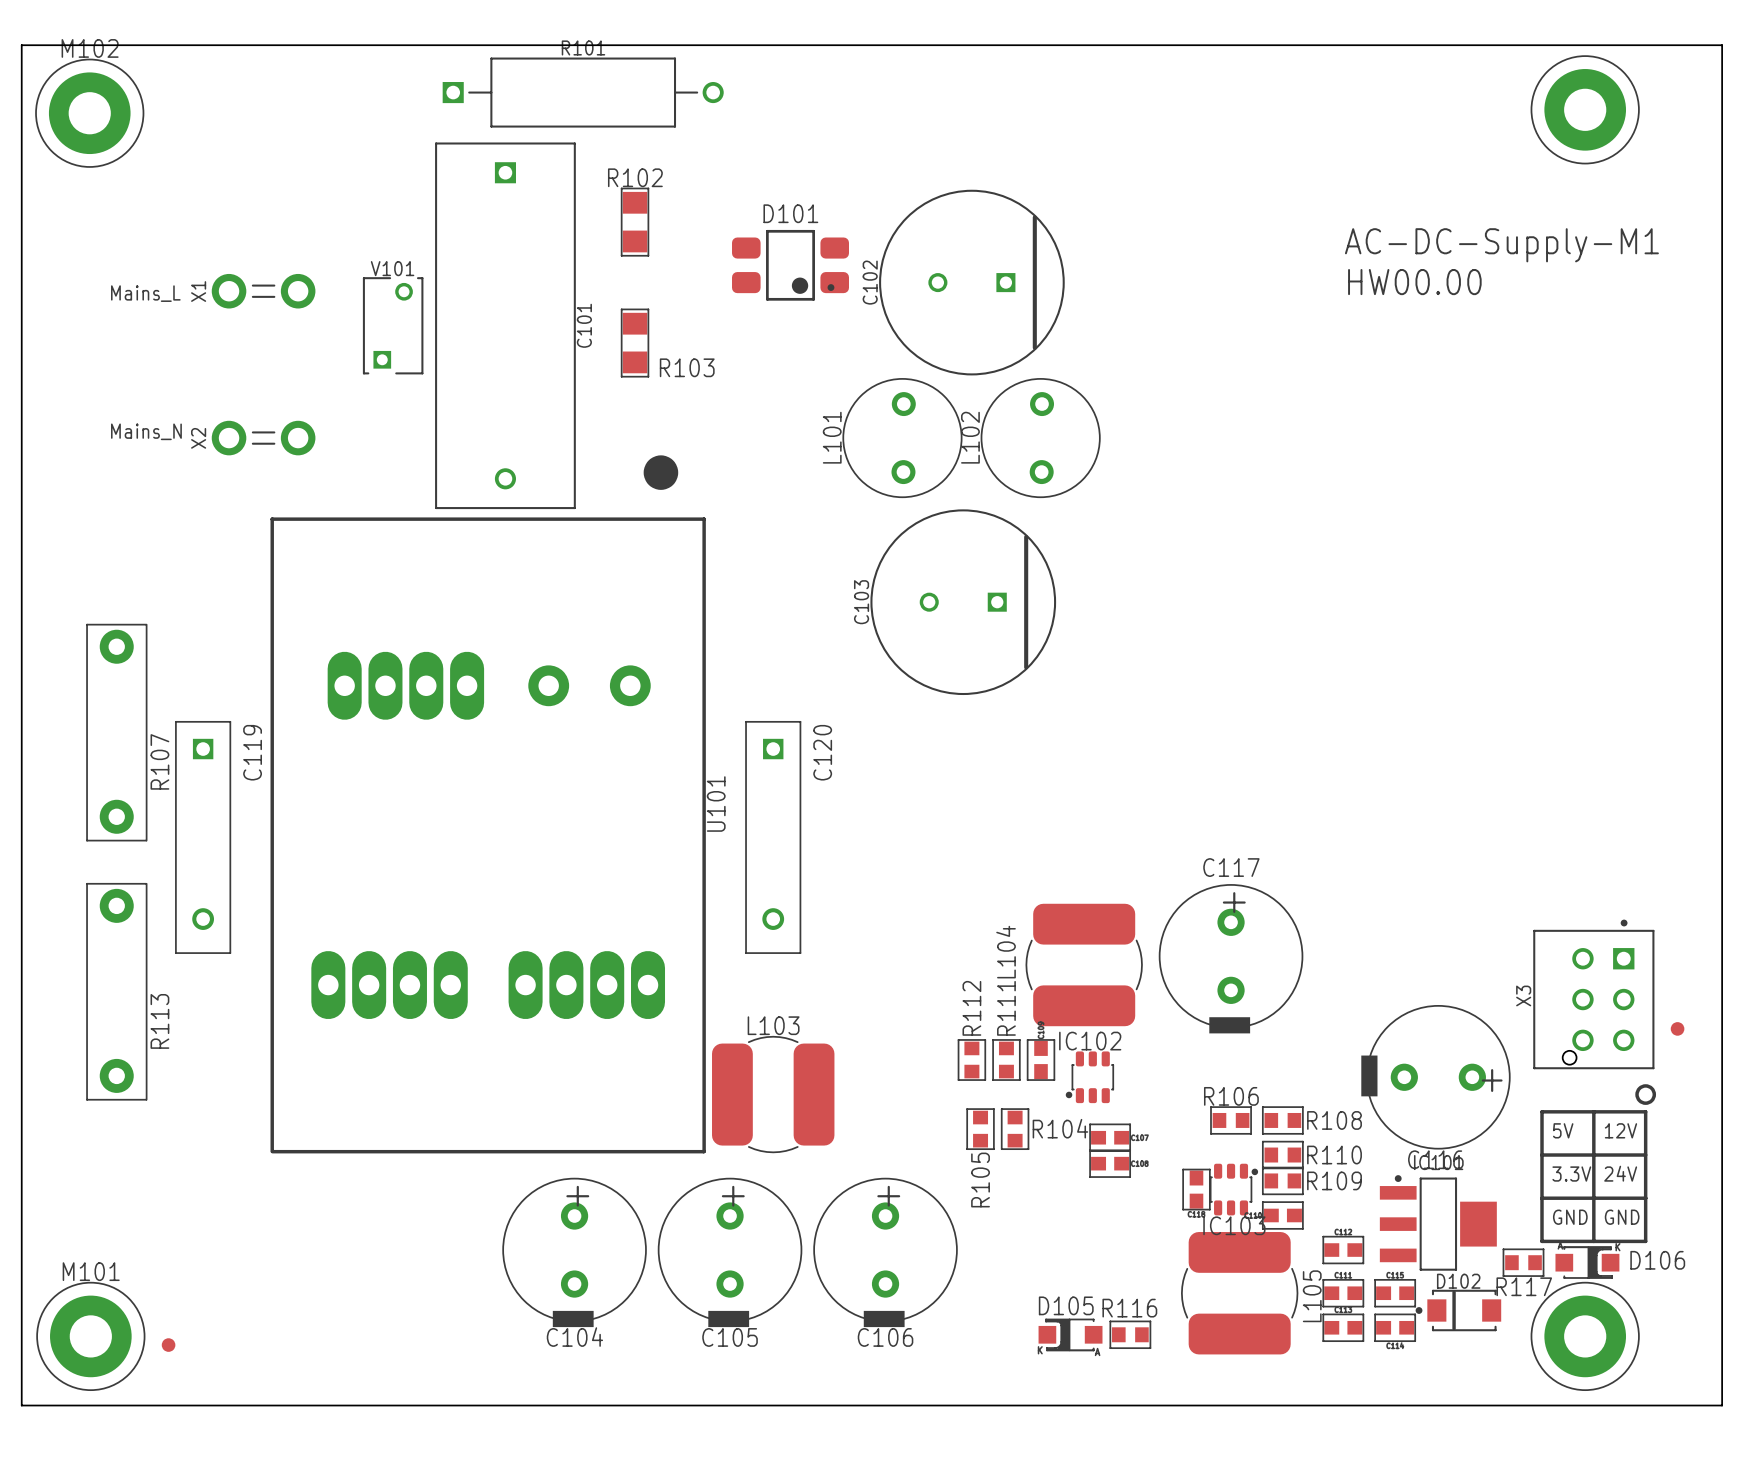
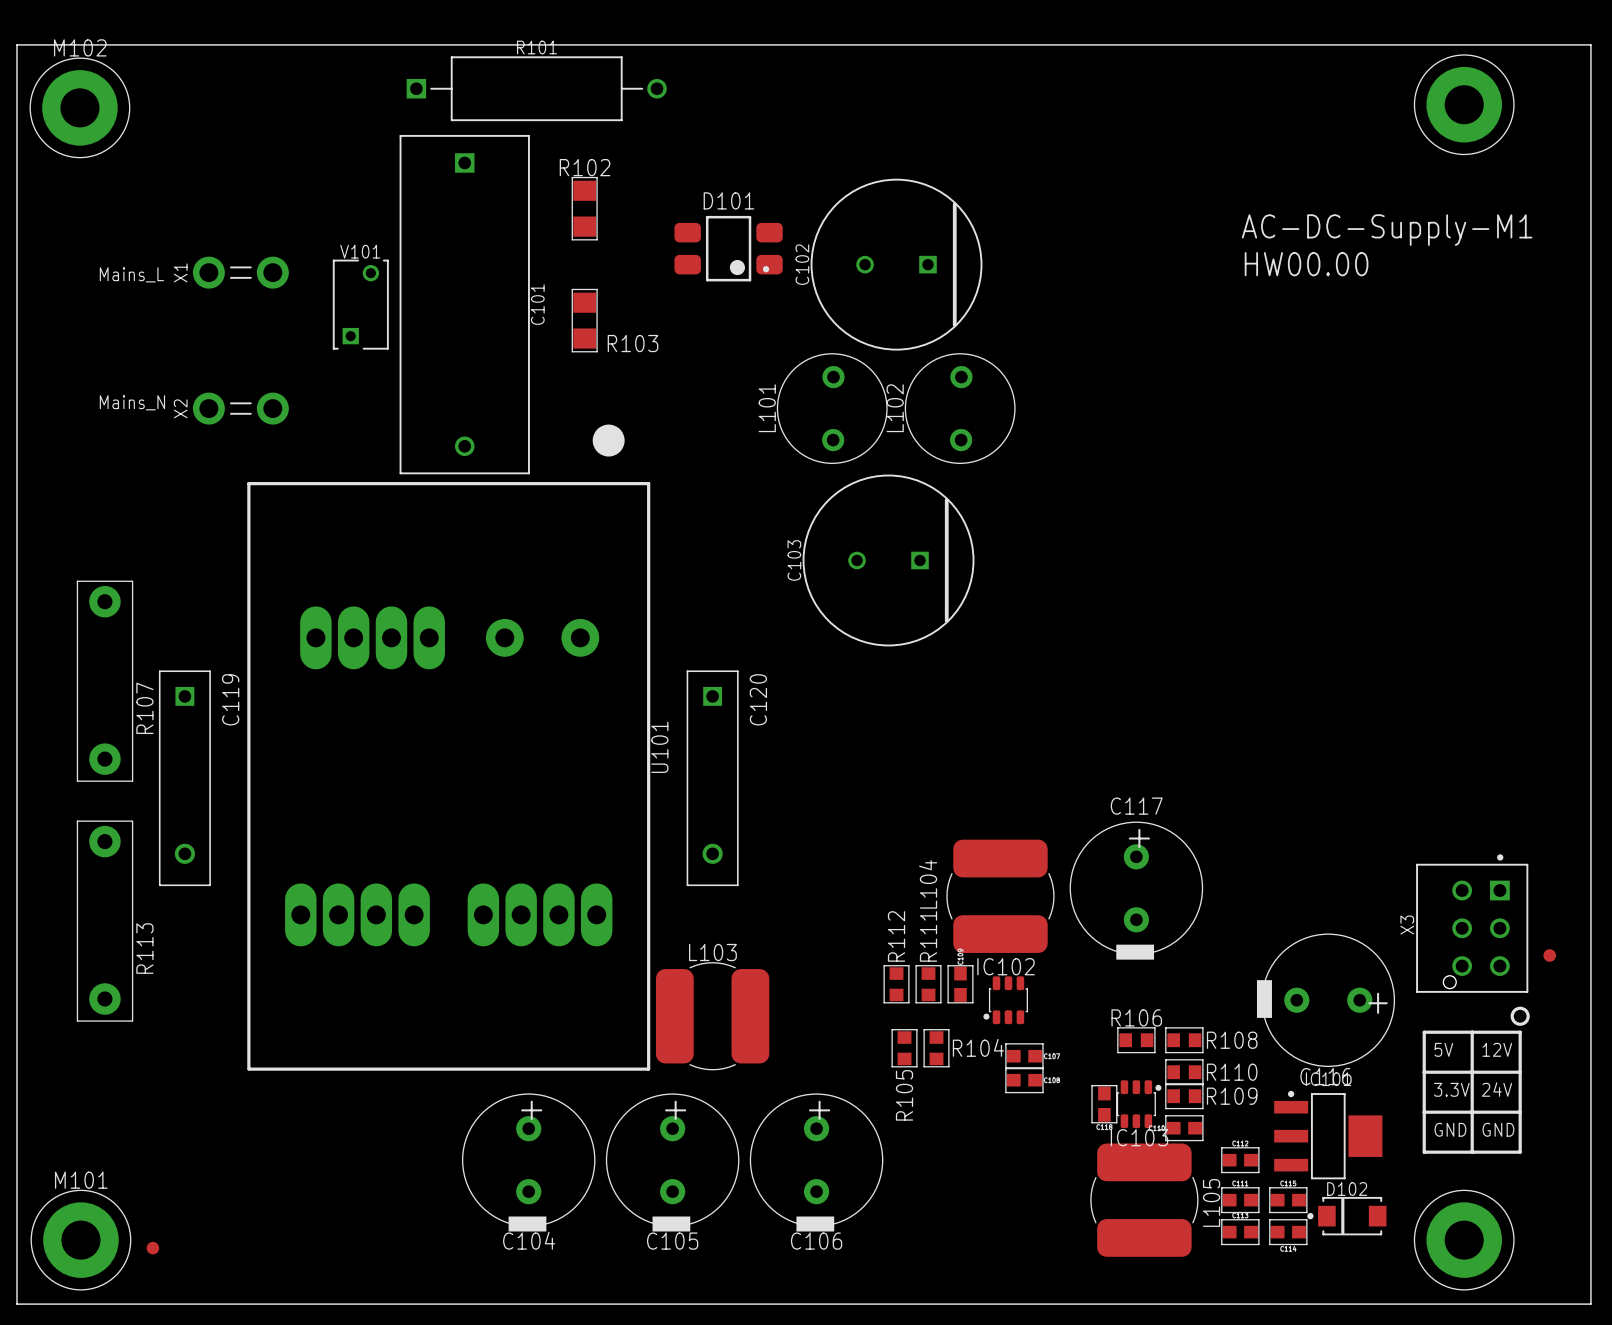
R117: (1523, 1262) -> none
D106: (1587, 1262) -> none
D105: (1070, 1334) -> none
R116: (1130, 1334) -> none

